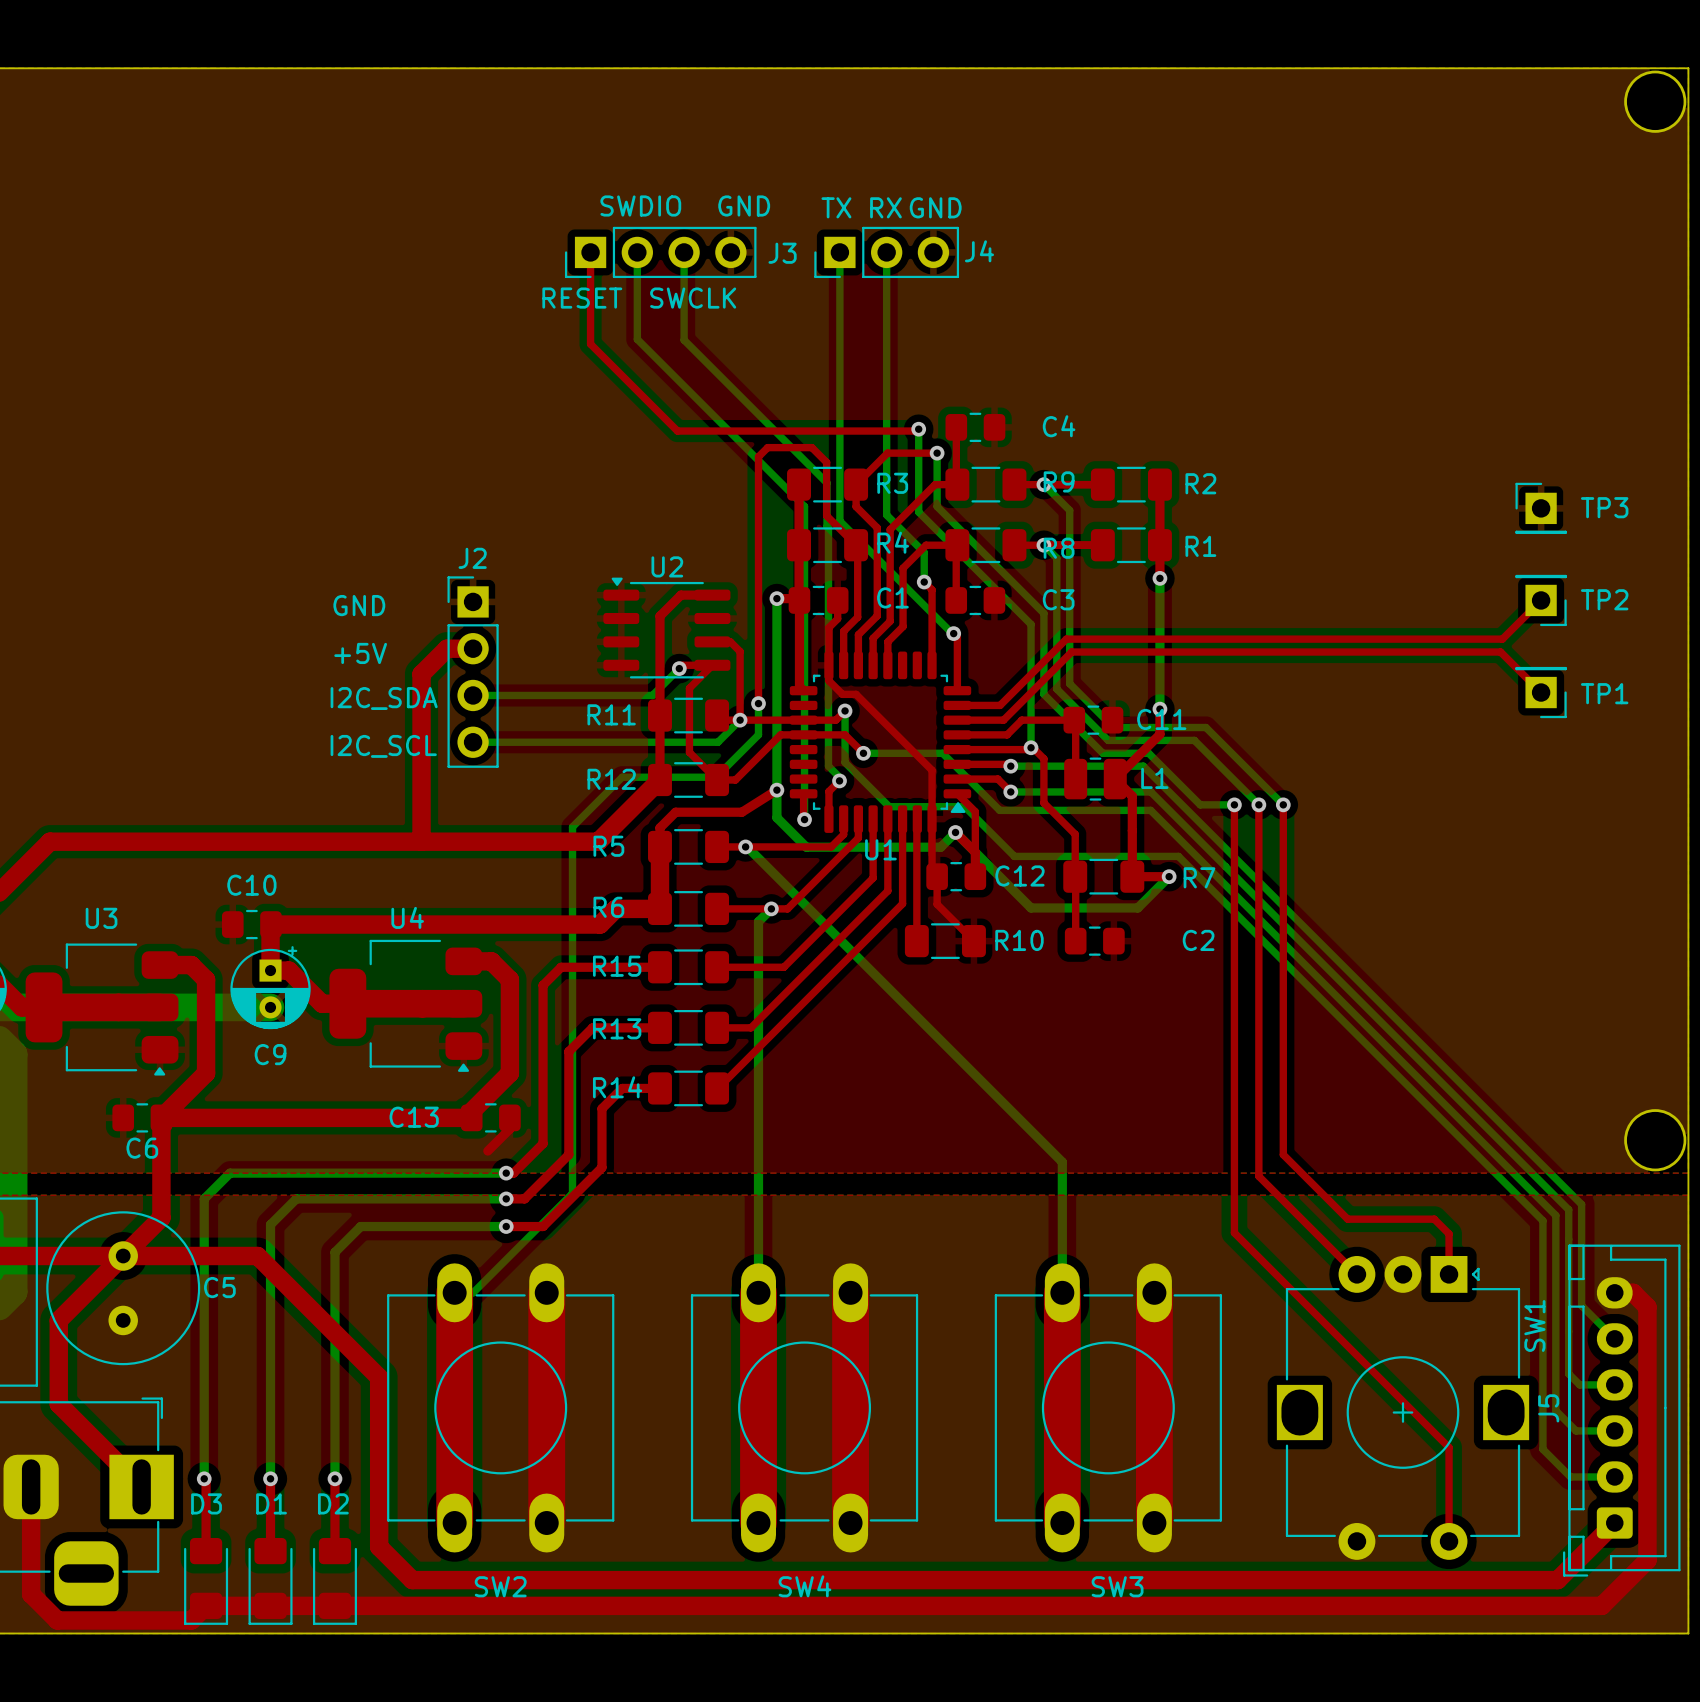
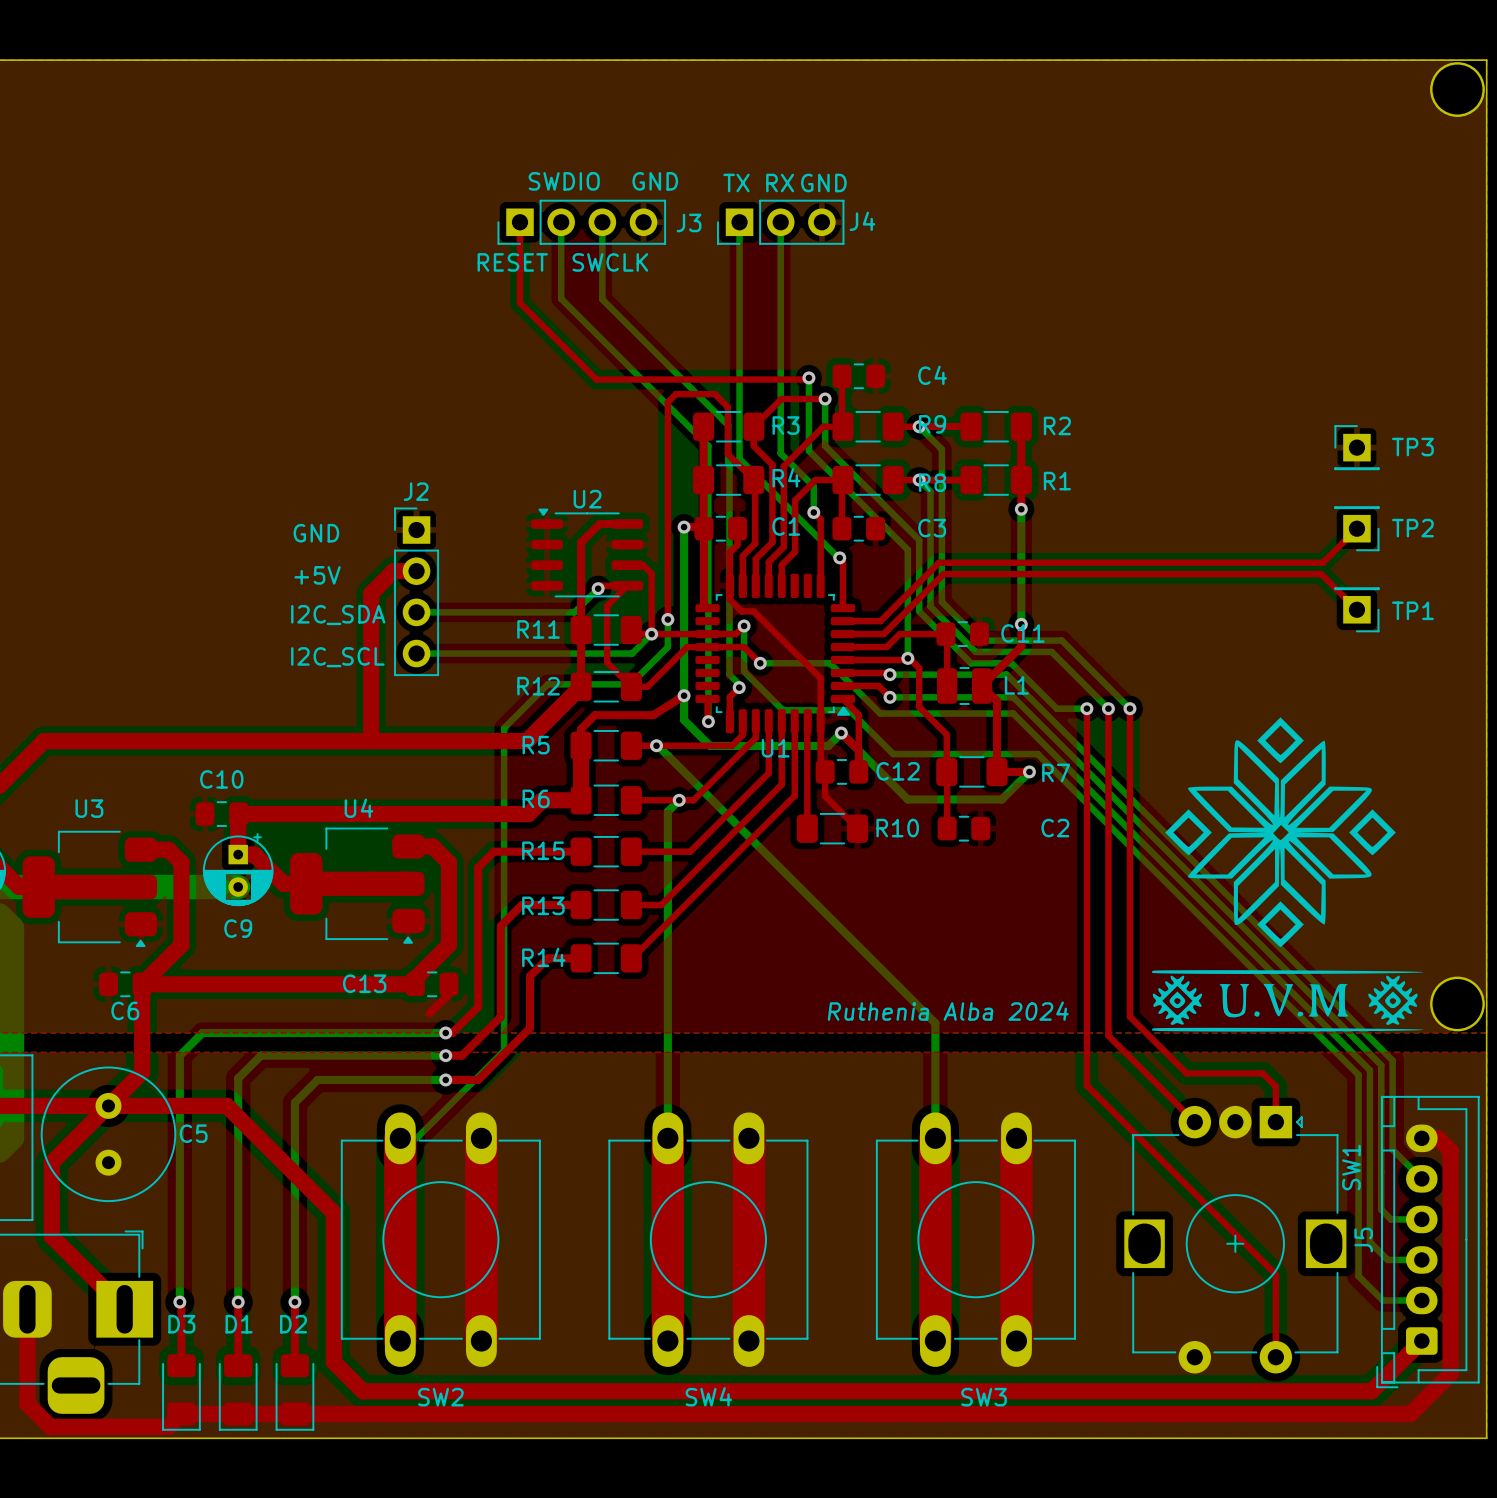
drawing: none -> [1165, 717, 1396, 948]
drawing: none -> [1152, 970, 1424, 1032]
text: none -> Ruthenia Alba 2024 (948, 1011)

